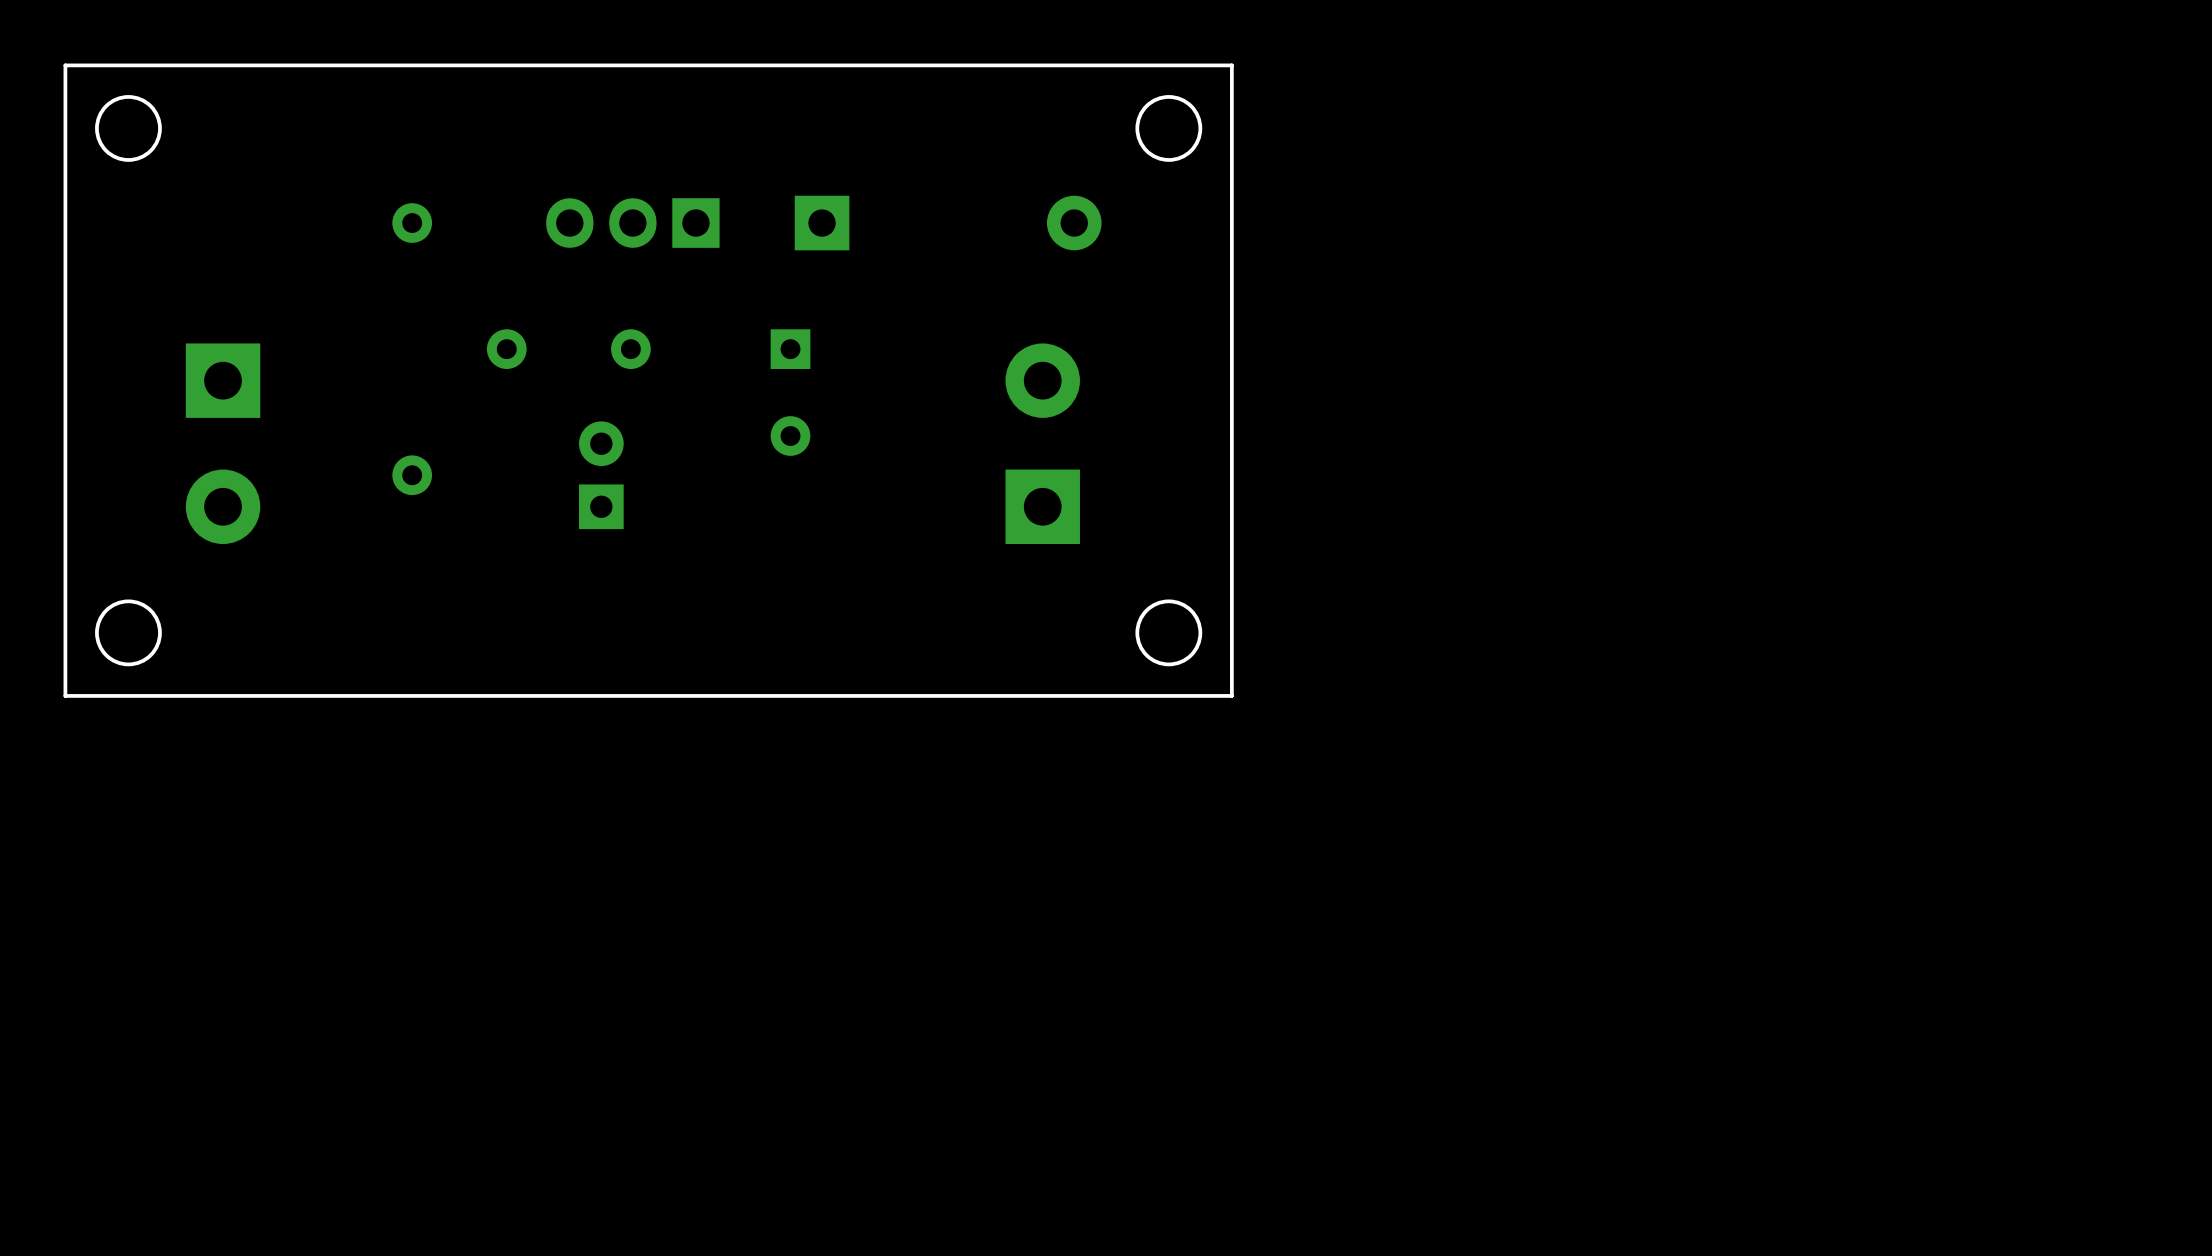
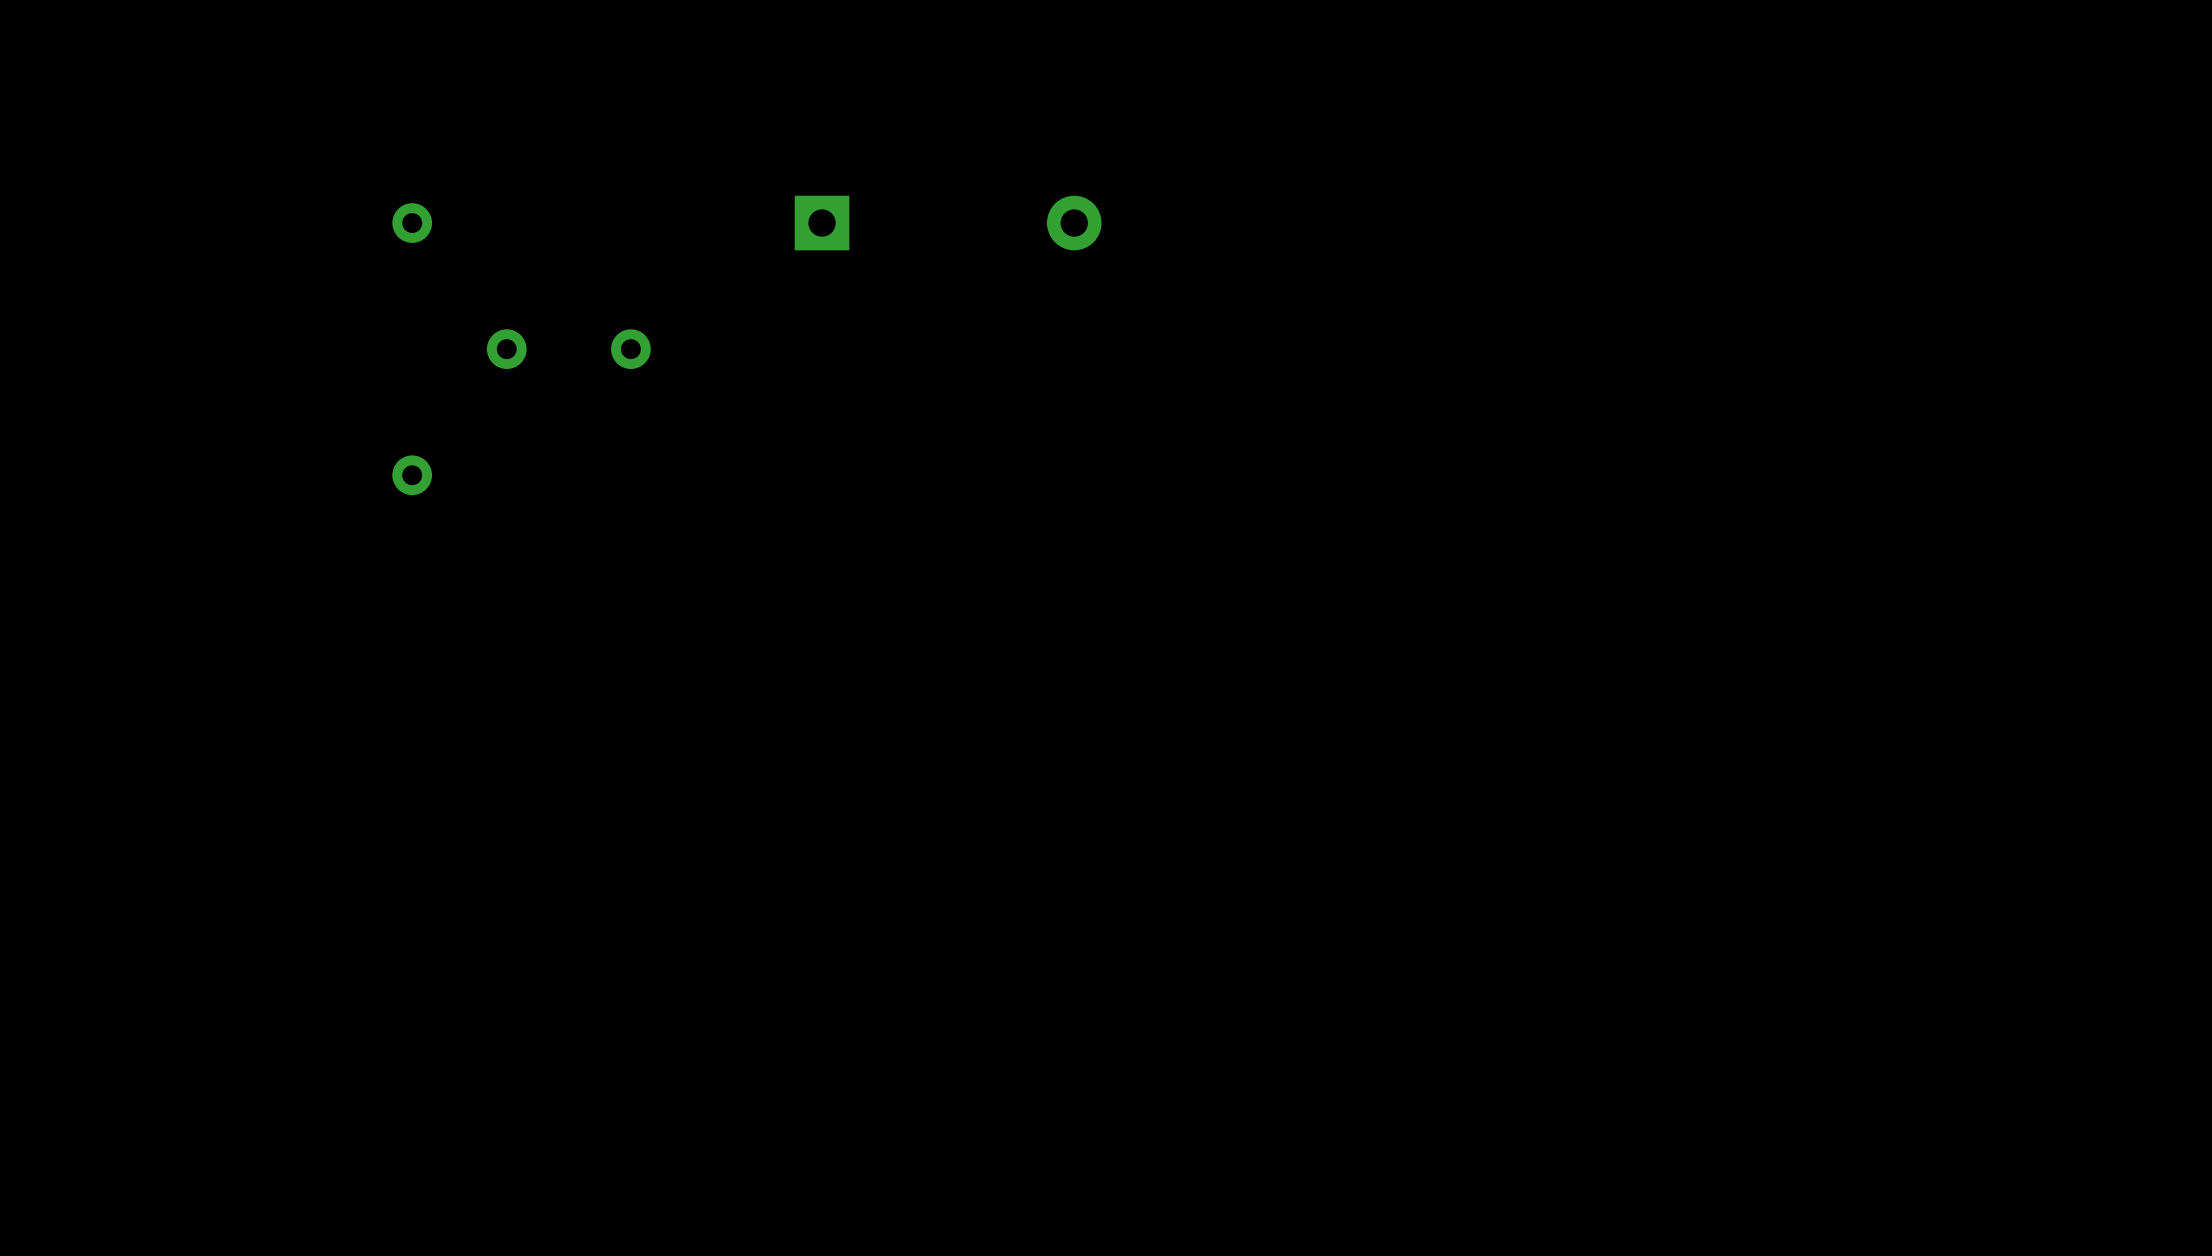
board edge: (1231, 65) (1231, 695) (65, 695) (65, 65) (1231, 65) -> none
round board edge: [95, 95, 162, 162] -> none
round board edge: [1135, 95, 1203, 162] -> none
part: (632, 223) -> none
part: (790, 392) -> none
part: (223, 443) -> none
part: (1042, 443) -> none
part: (601, 475) -> none
round board edge: [95, 599, 162, 667] -> none
round board edge: [1135, 599, 1203, 667] -> none

